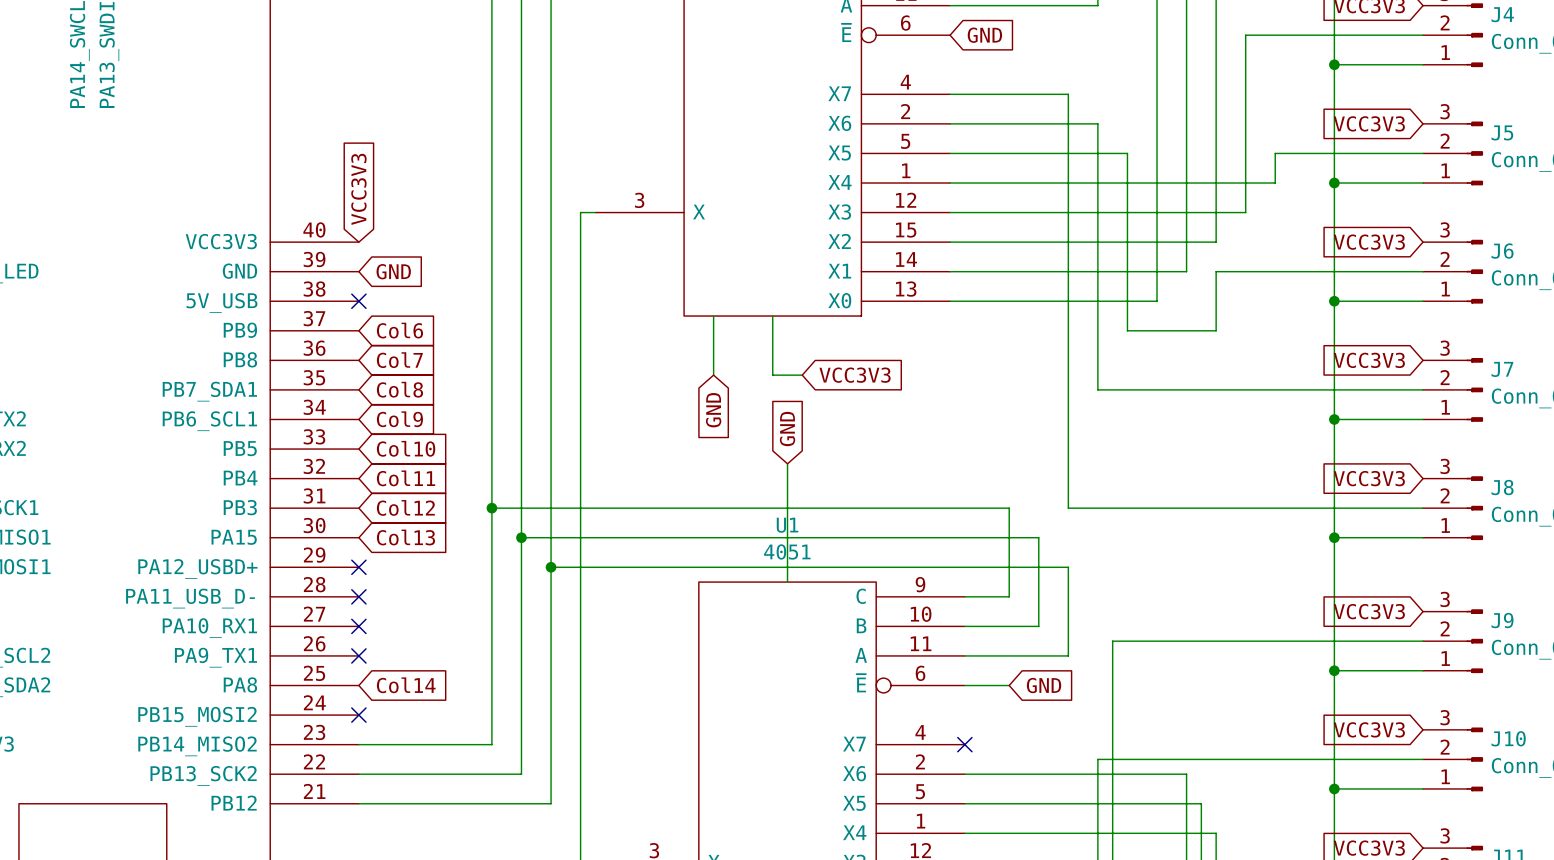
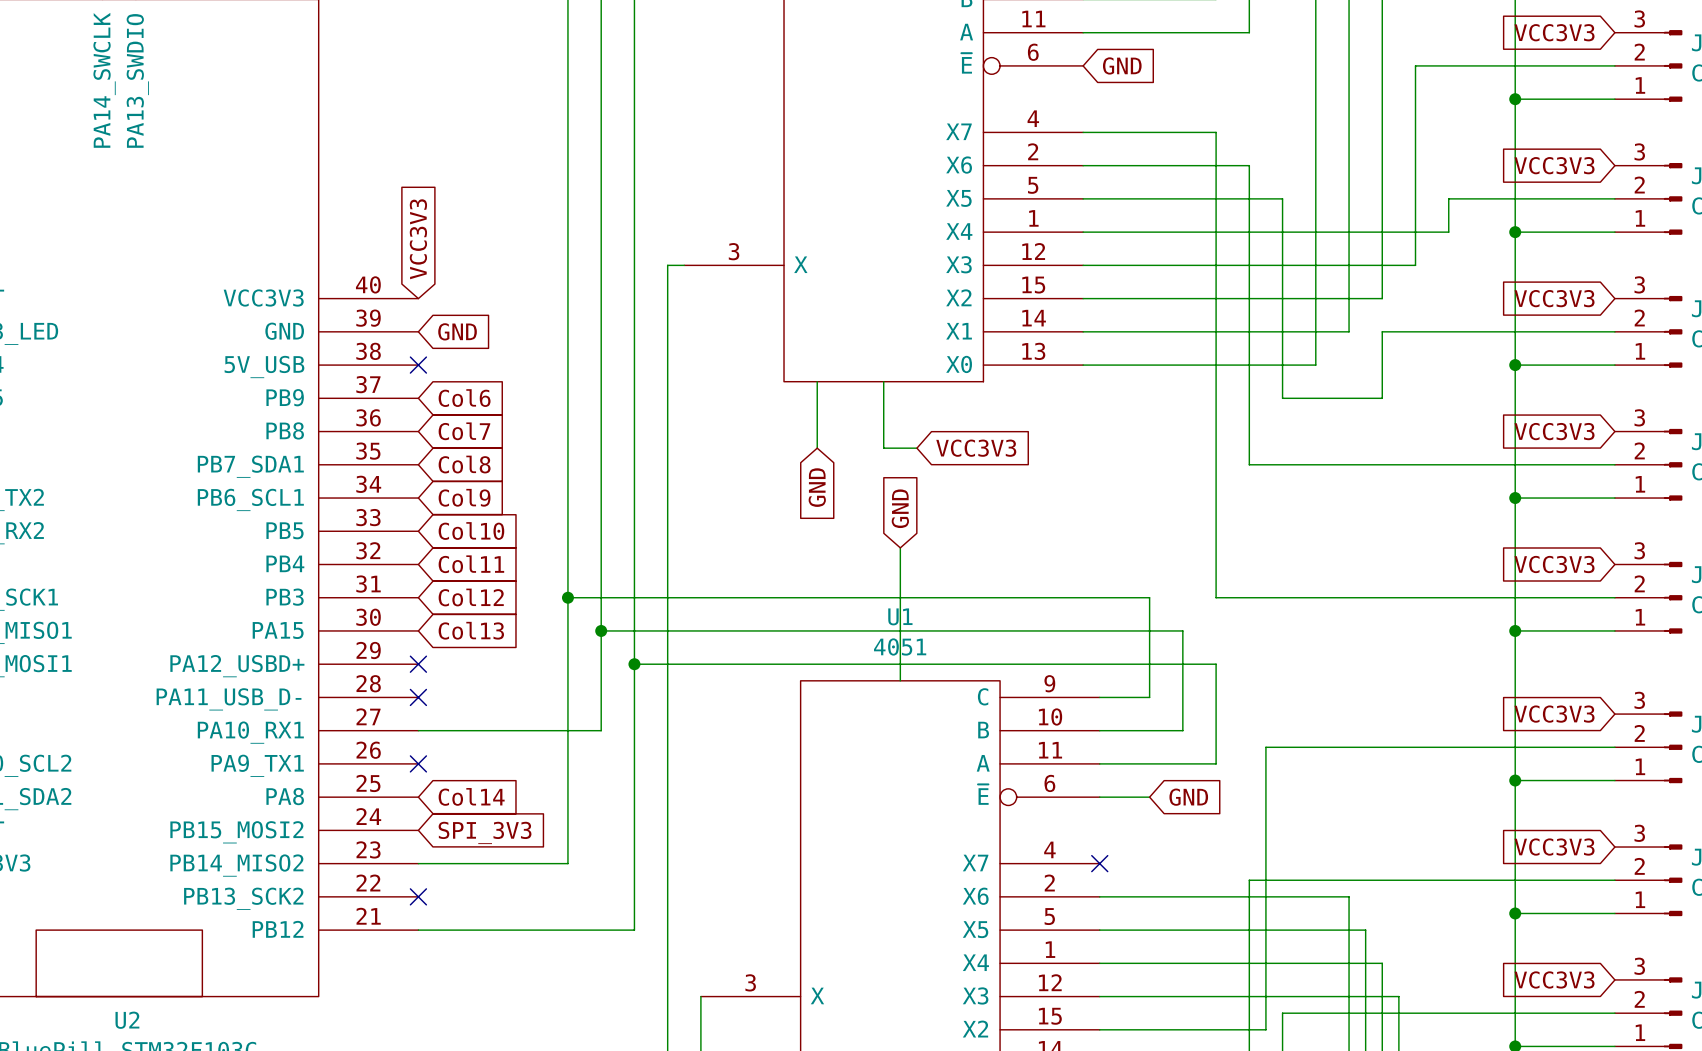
no-connect mark: (358, 626) -> none
wire: (521, 626) (521, 774) (358, 774) -> (601, 730) (418, 730)
no-connect mark position: (358, 715) -> (418, 896)
global label: none -> SPI_3V3 (485, 832)

